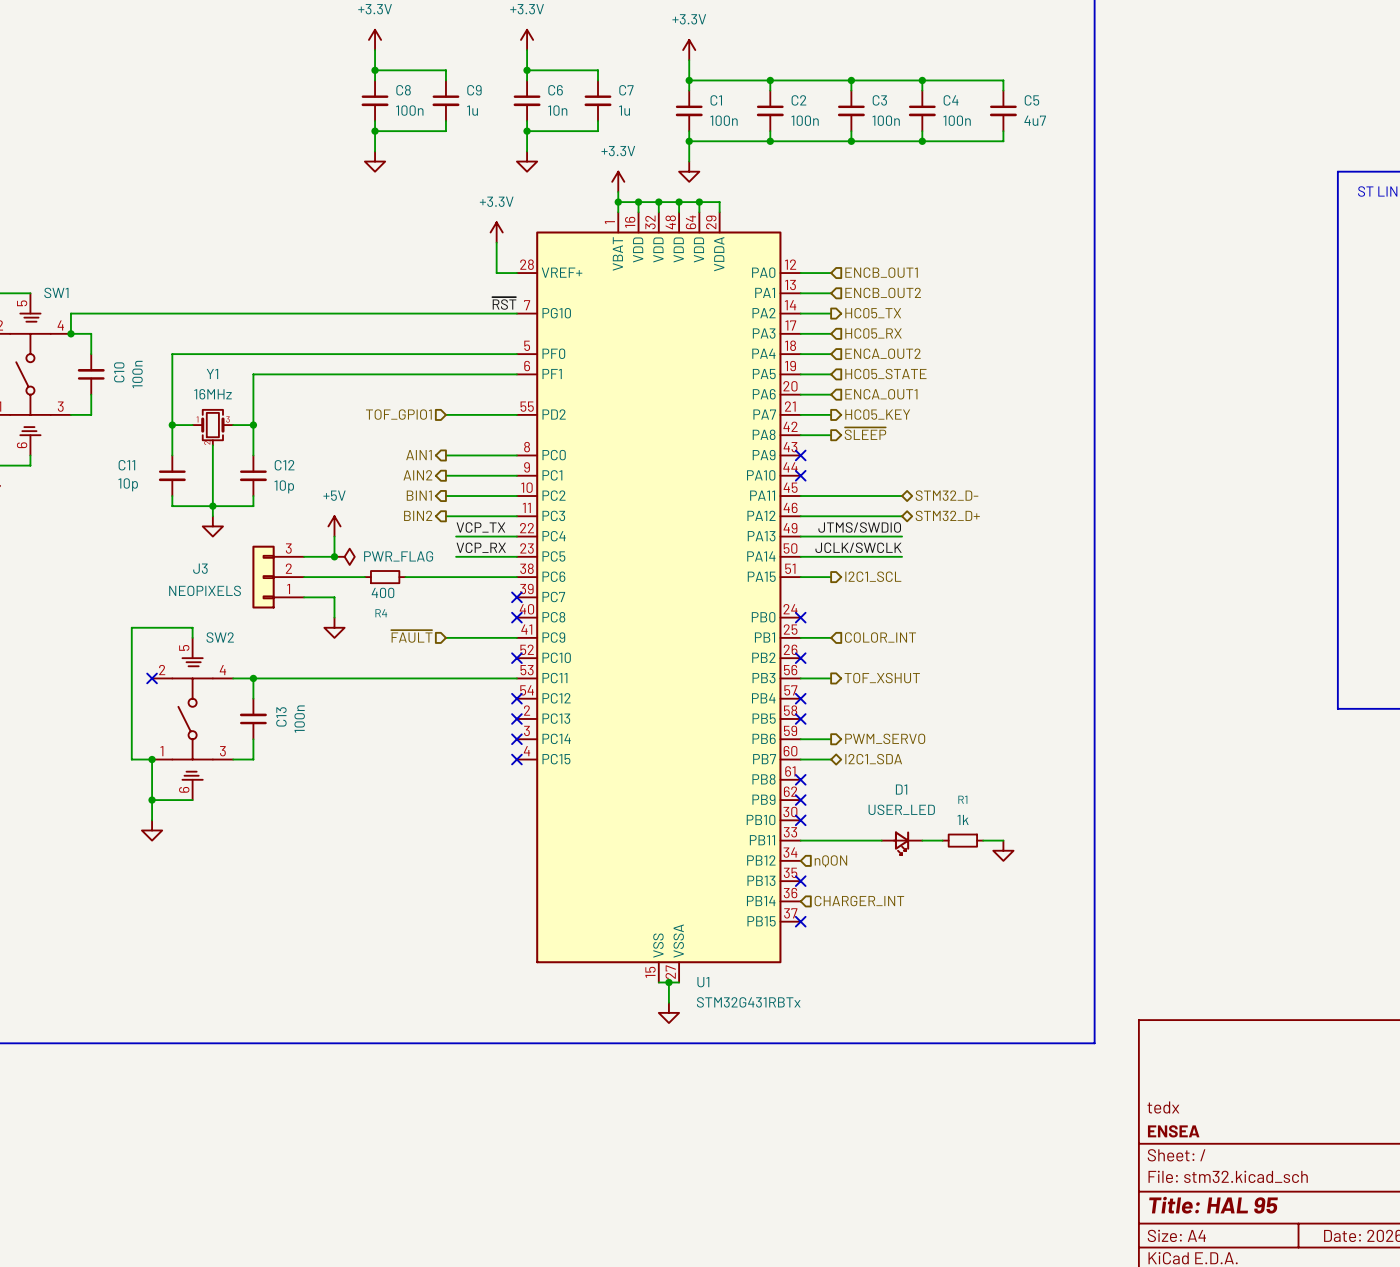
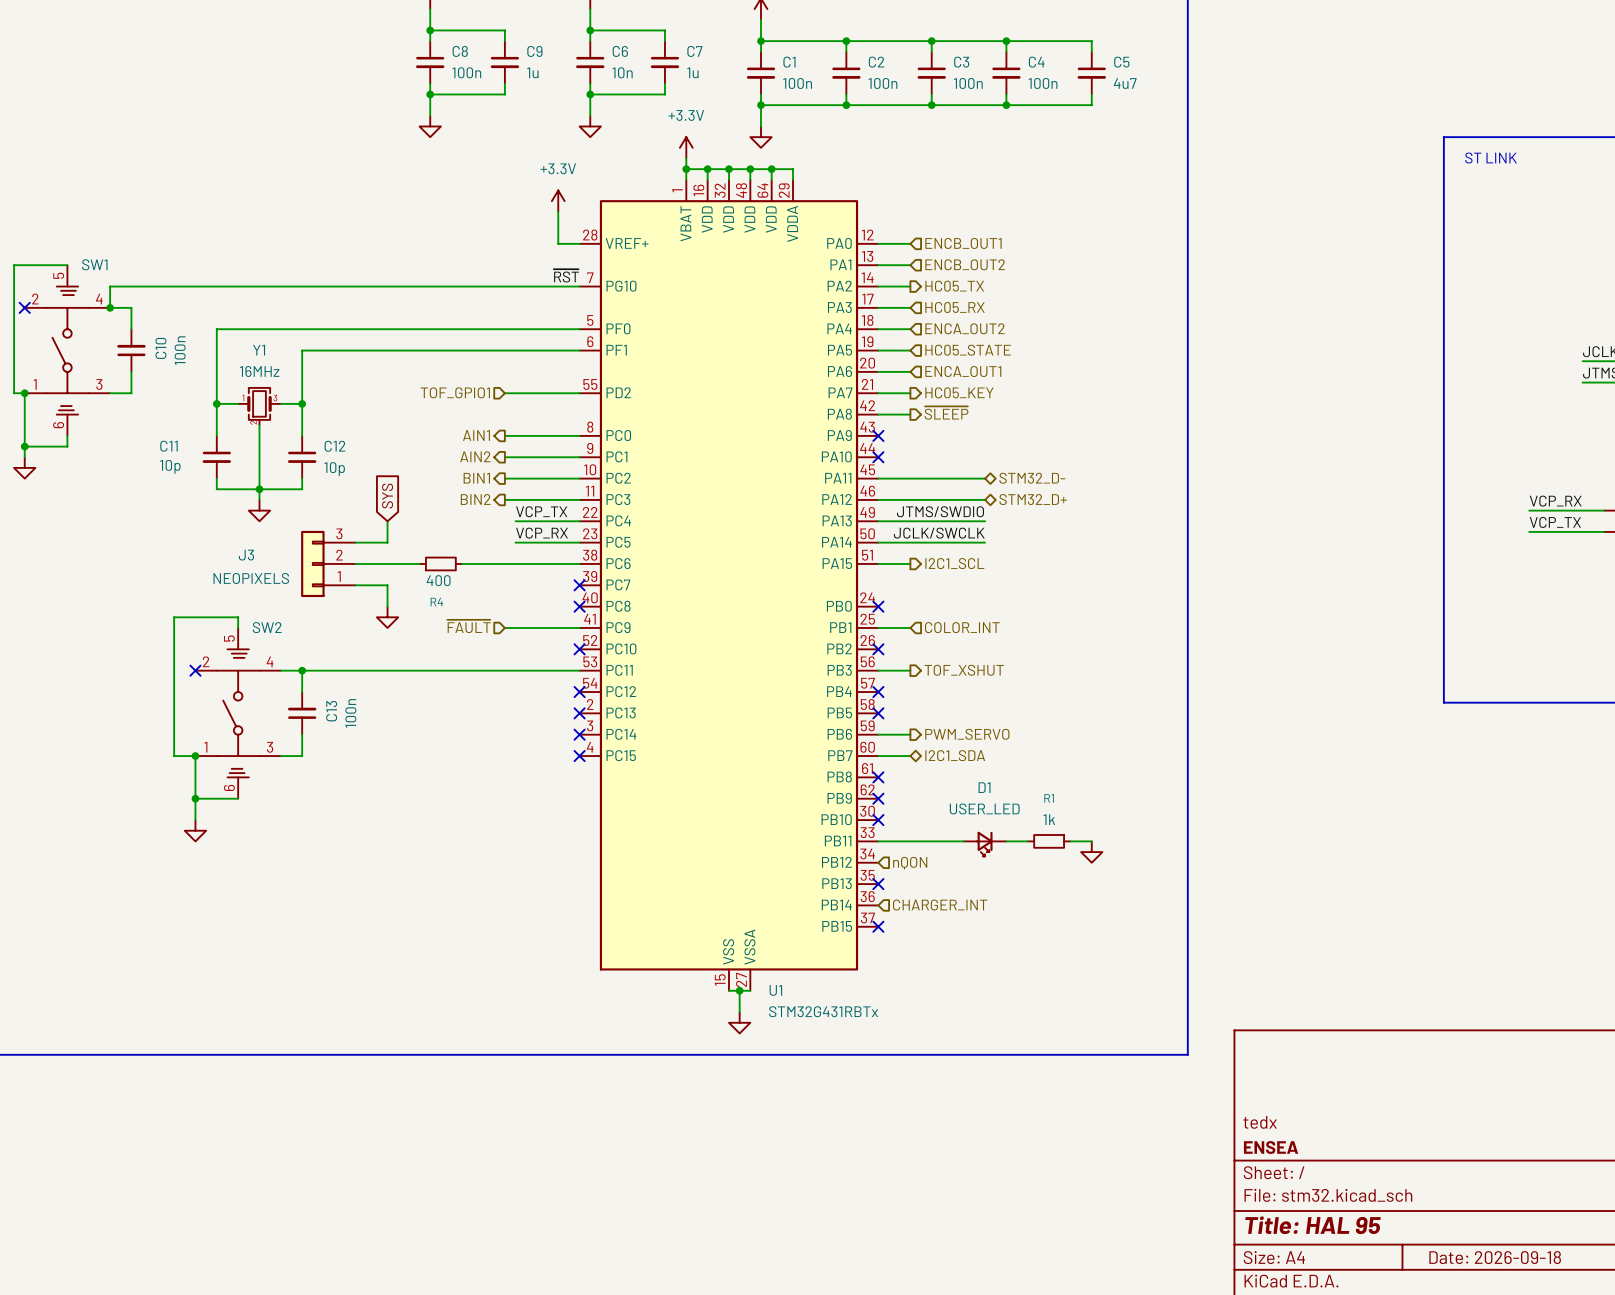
global label: none -> SYS (387, 496)
power symbol: +5V (334, 526) -> none
junction: (334, 556) -> none
power symbol: PWR_FLAG (344, 556) -> none

